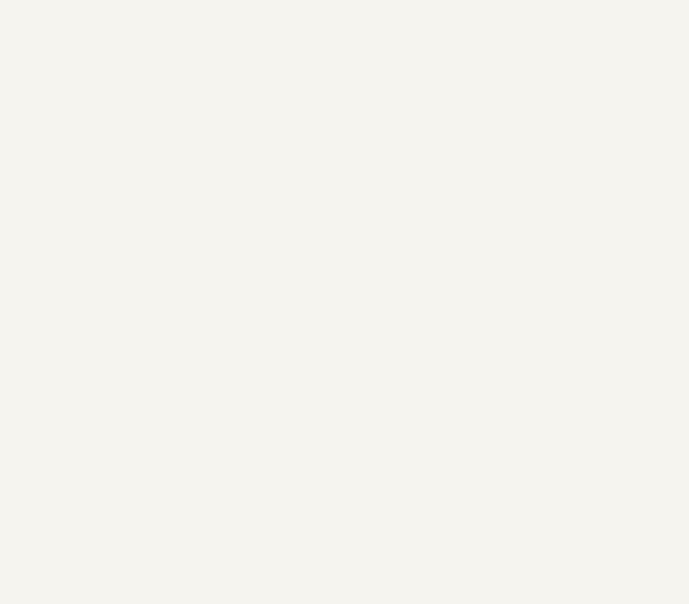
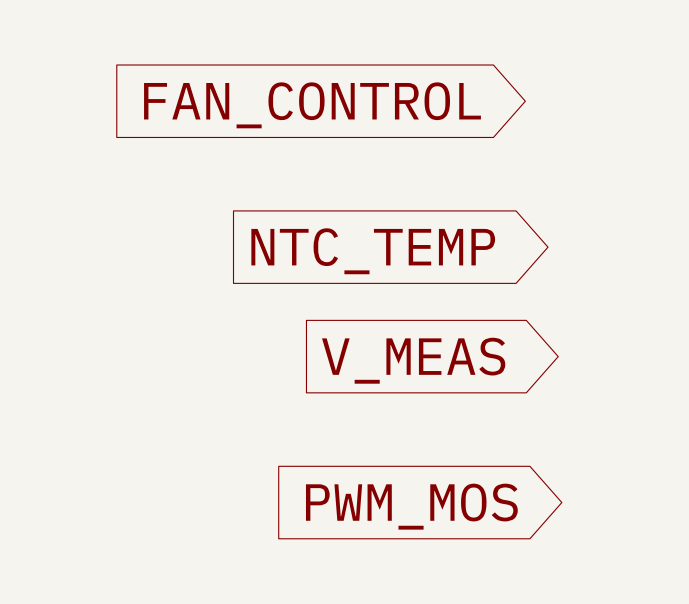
global label: none -> FAN_CONTROL (312, 105)
global label: none -> NTC_TEMP (373, 251)
global label: none -> V_MEAS (413, 360)
global label: none -> PWM_MOS (411, 506)

